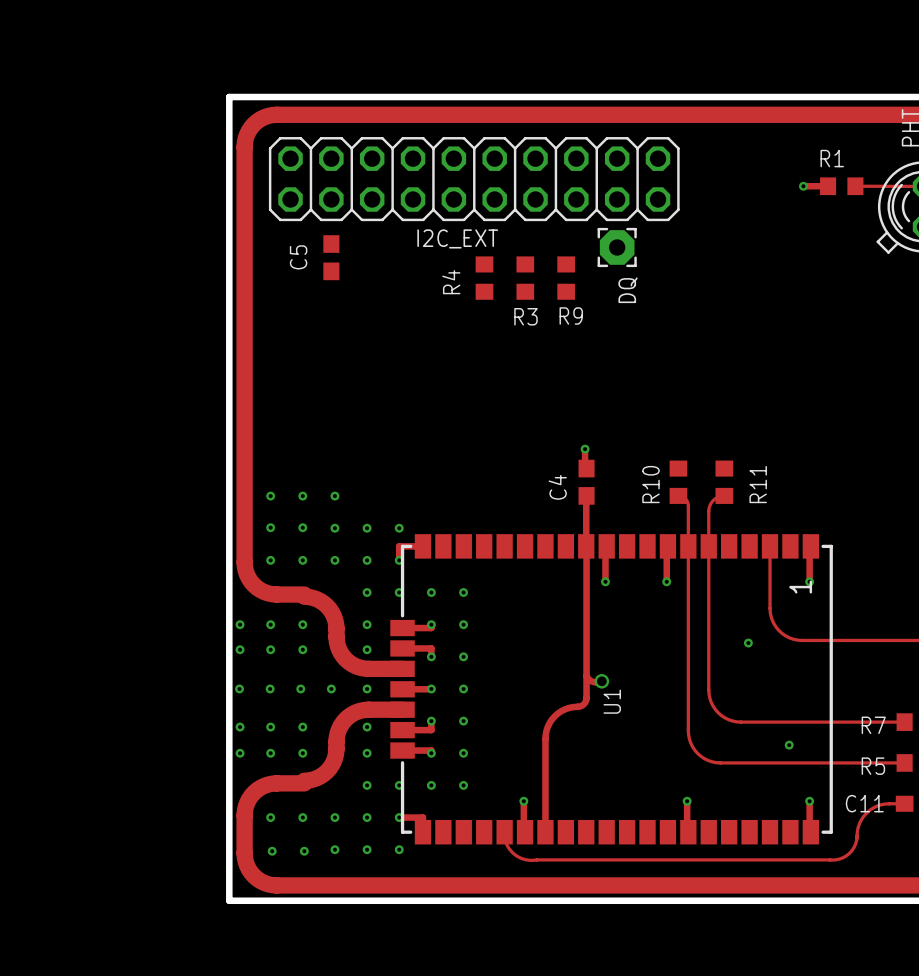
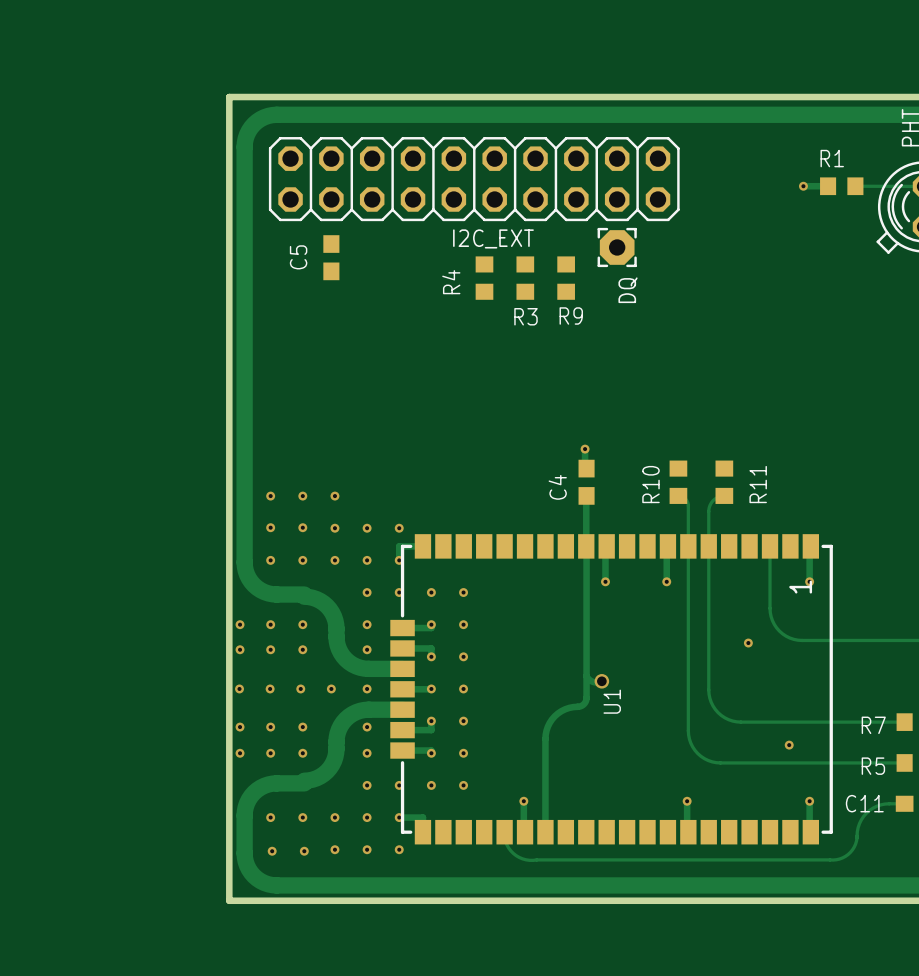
I2C_EXT name position: I2C_EXT (457, 238) -> I2C_EXT (493, 238)

